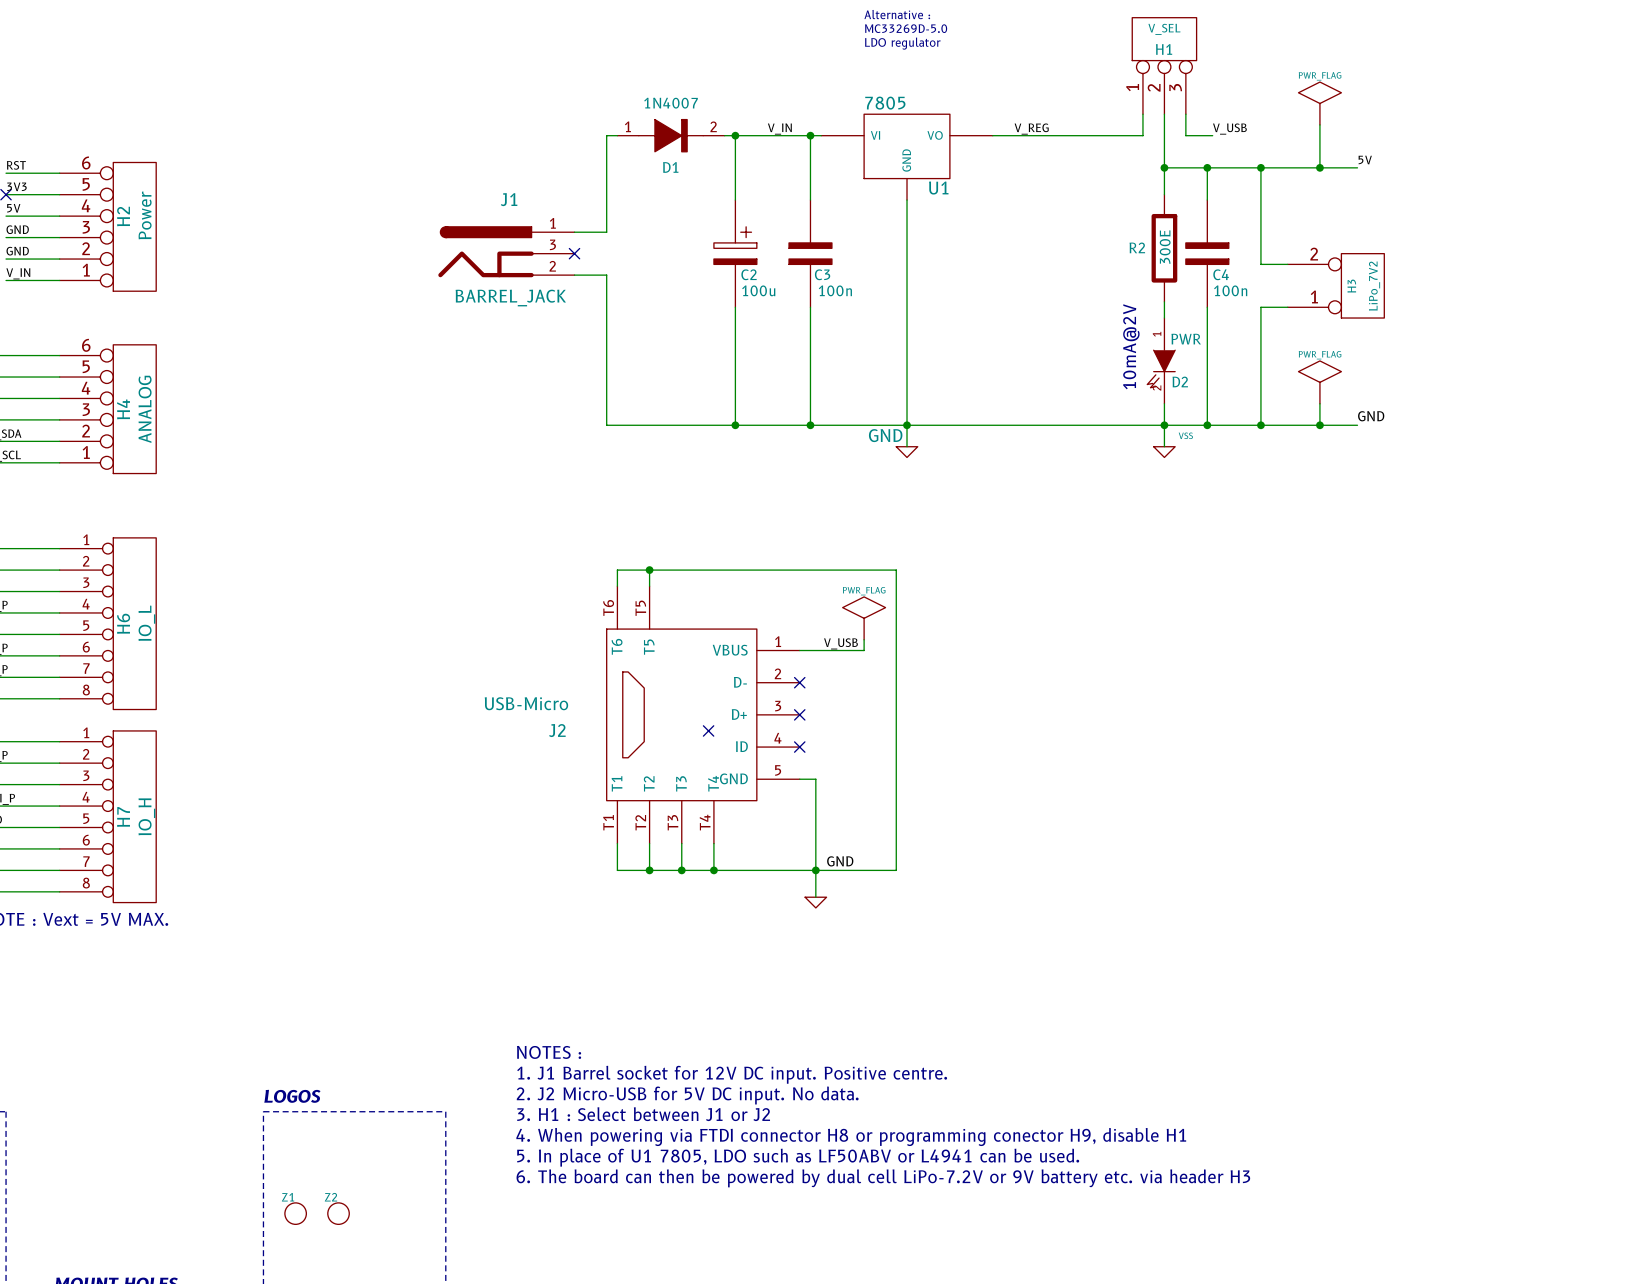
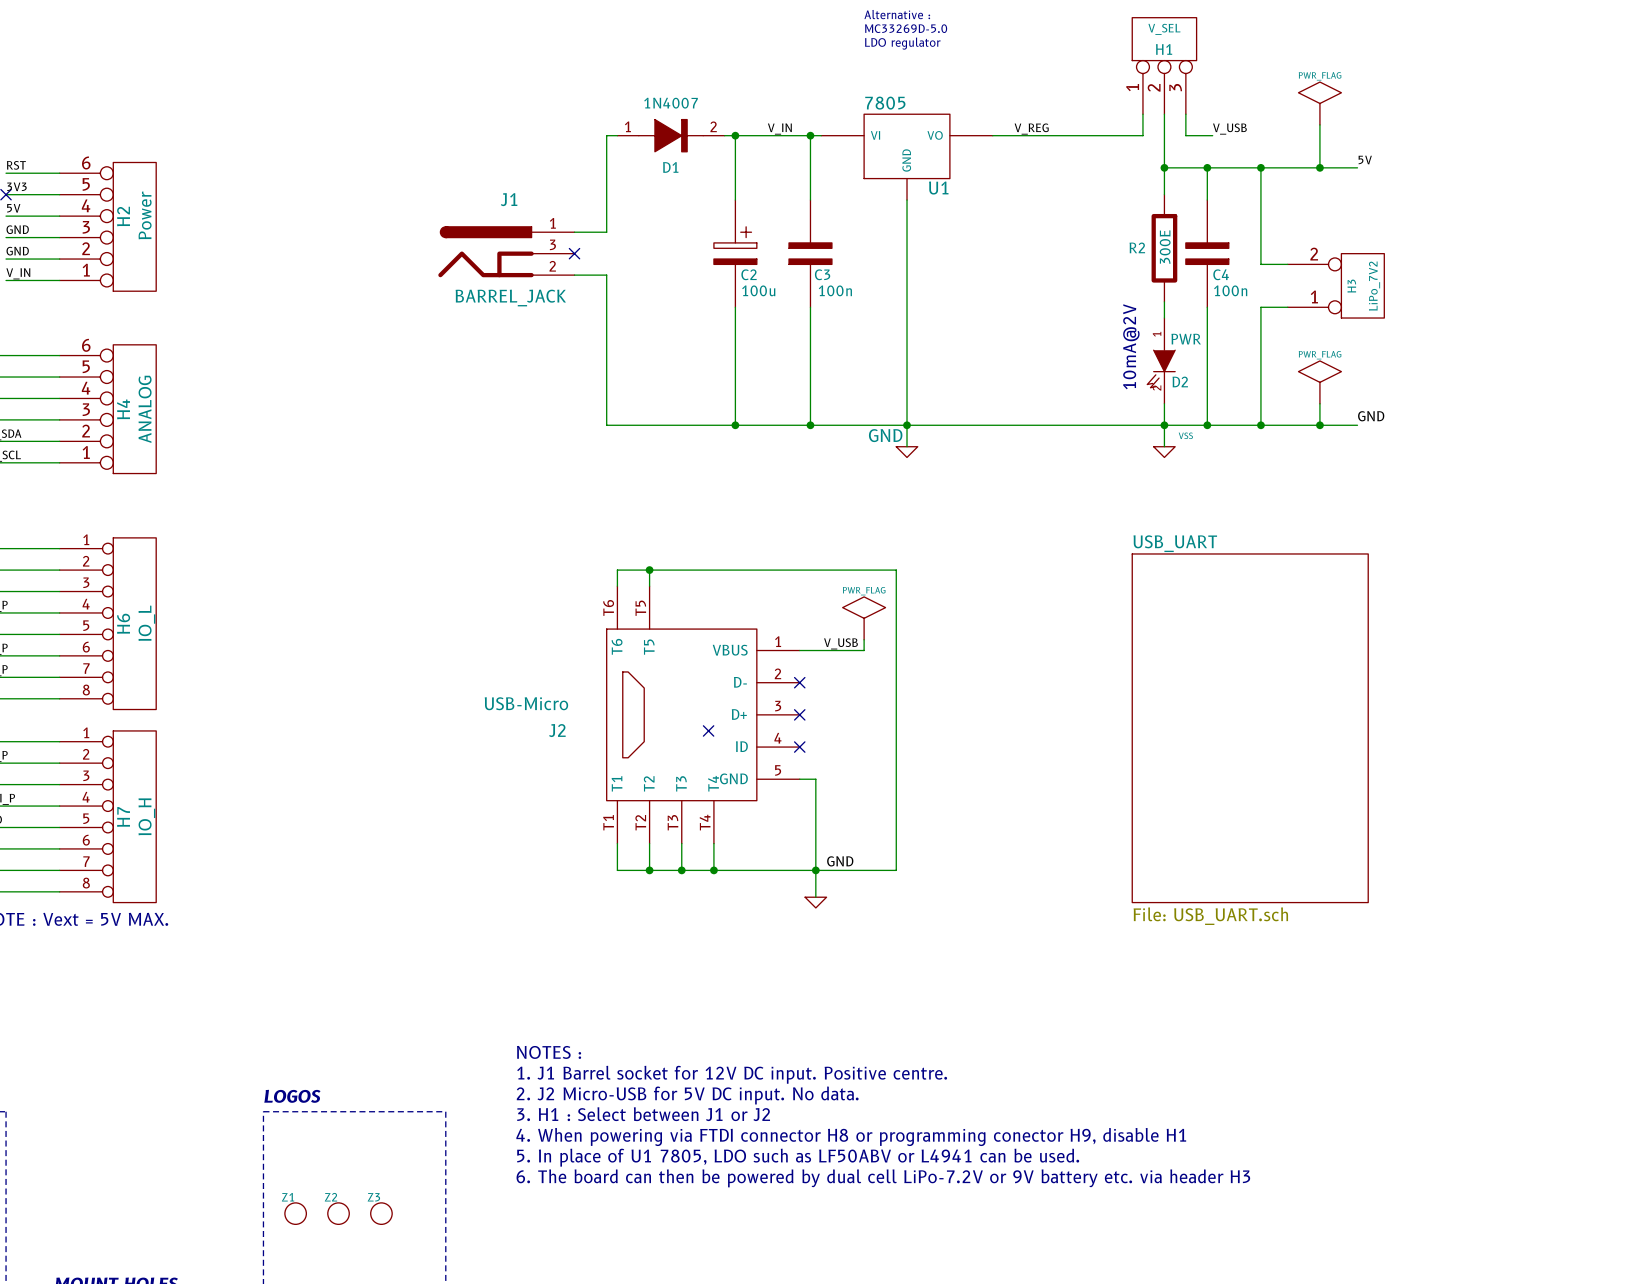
sheet USB_UART: none -> File: USB_UART.sch (1250, 728)
Z3: none -> (381, 1213)

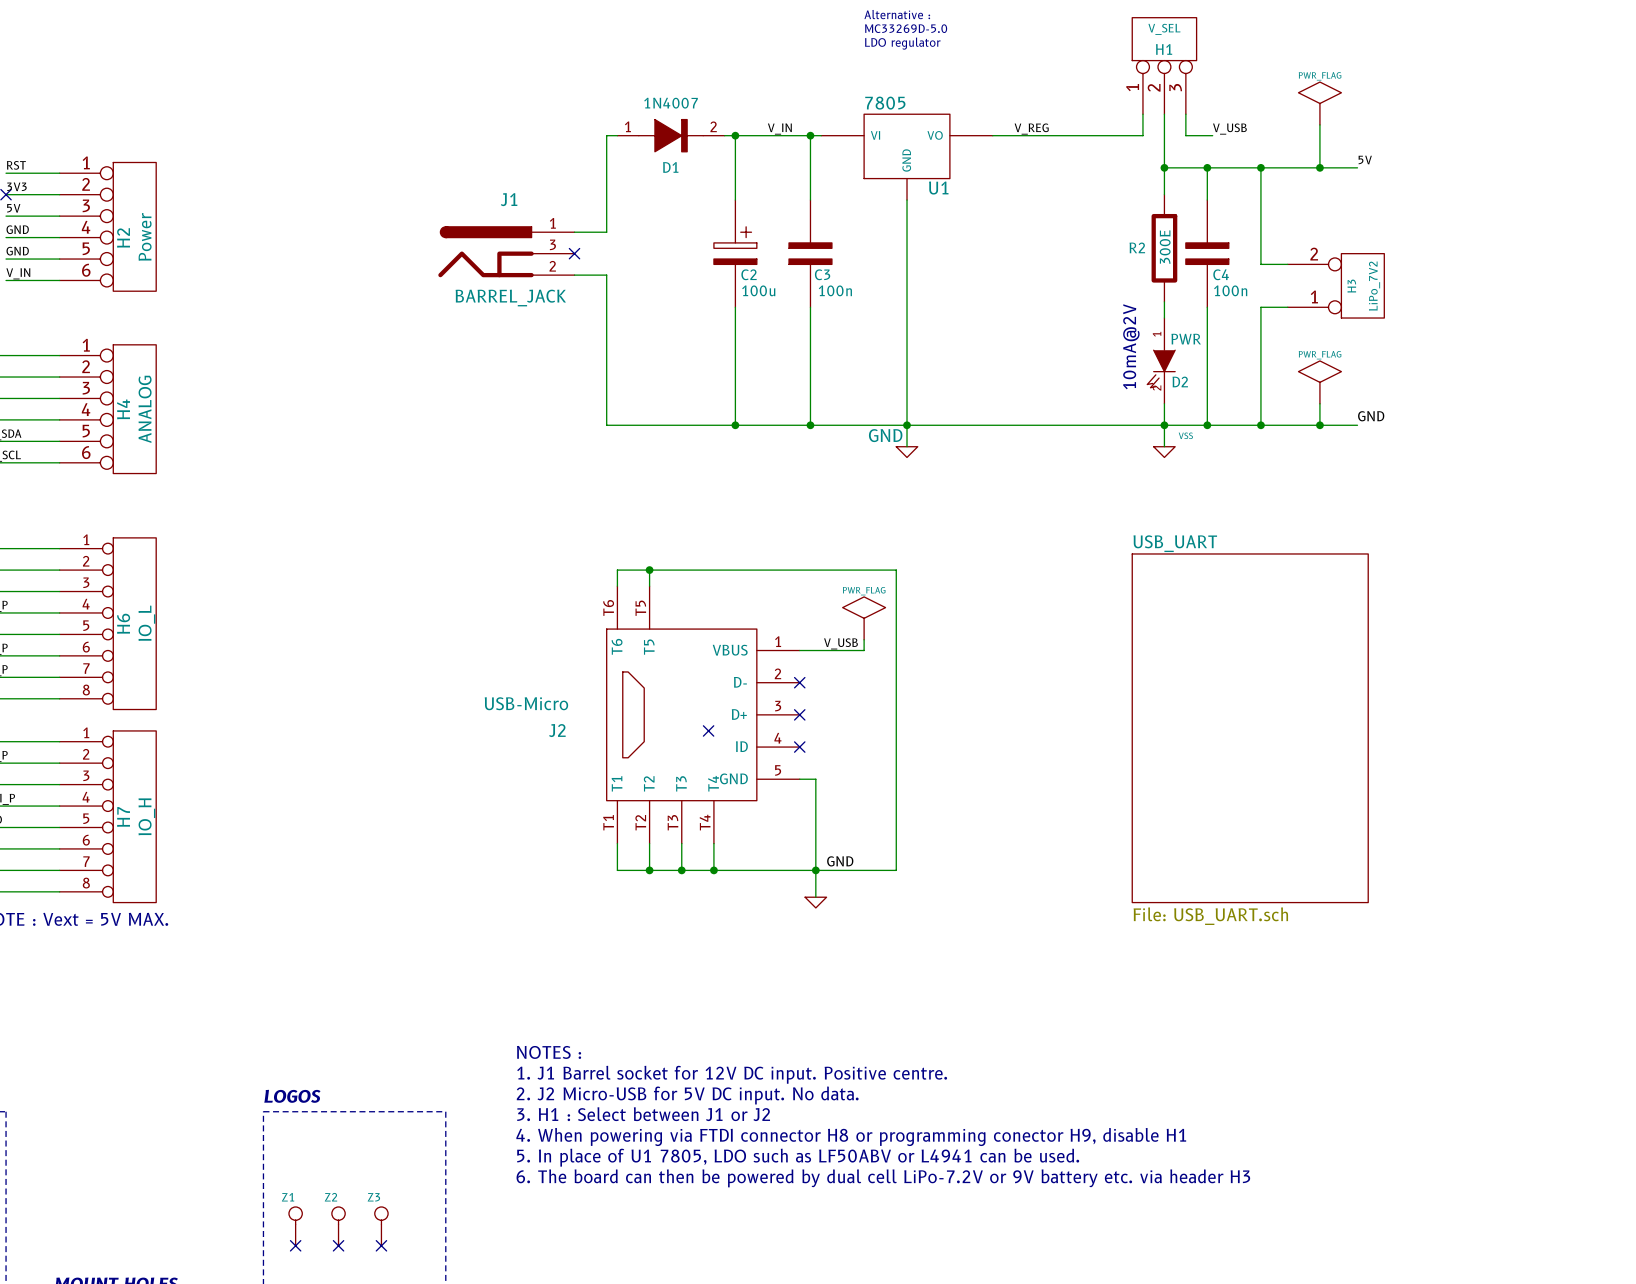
H2 flip: as is (134, 226) -> up-down (134, 226)
H4 flip: as is (134, 409) -> up-down (134, 409)
Z1 symbol: [284, 1202, 307, 1225] -> [288, 1206, 303, 1246]
Z2 symbol: [327, 1202, 350, 1225] -> [331, 1206, 346, 1246]
Z3 symbol: [370, 1202, 393, 1225] -> [374, 1206, 389, 1246]
no-connect mark: none -> (295, 1245)
no-connect mark: none -> (338, 1245)
no-connect mark: none -> (381, 1245)

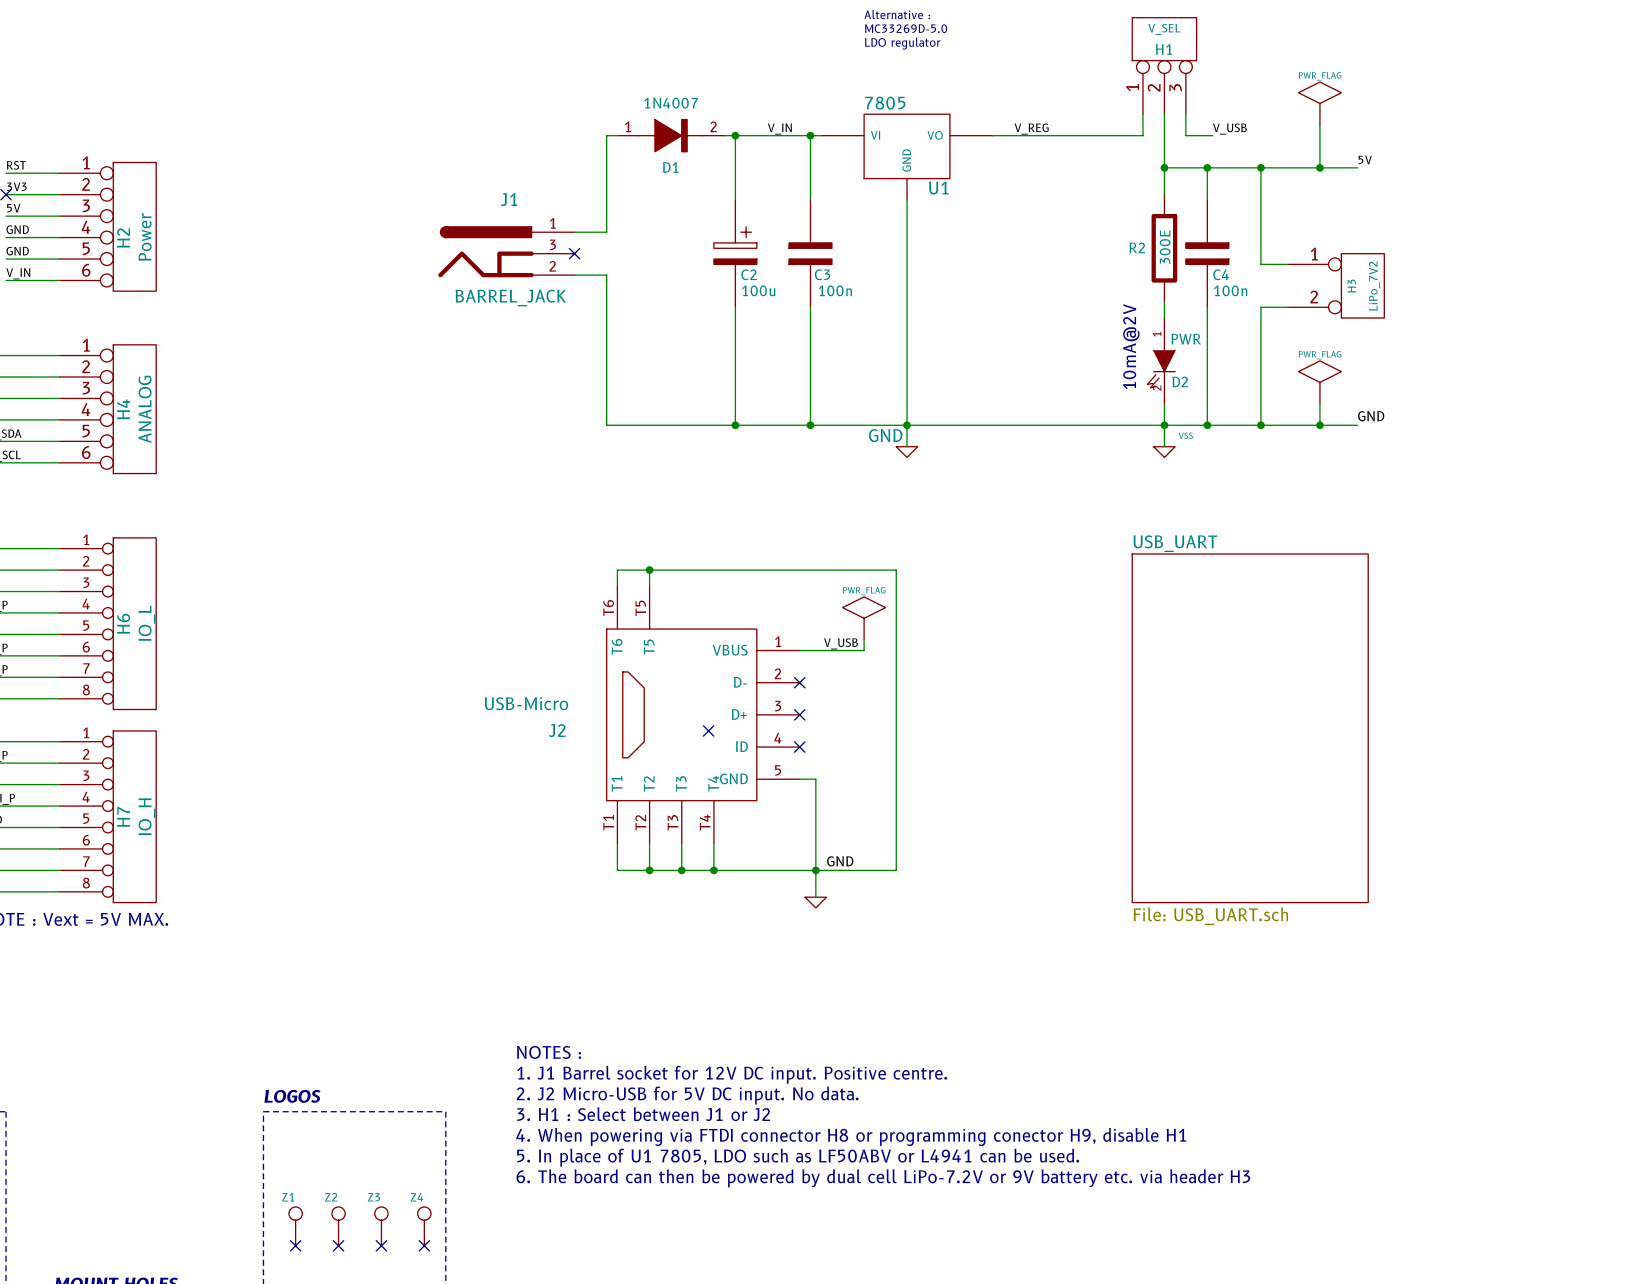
H3 flip: as is (1362, 285) -> up-down (1362, 285)
Z4: none -> (424, 1226)
no-connect mark: none -> (424, 1245)

